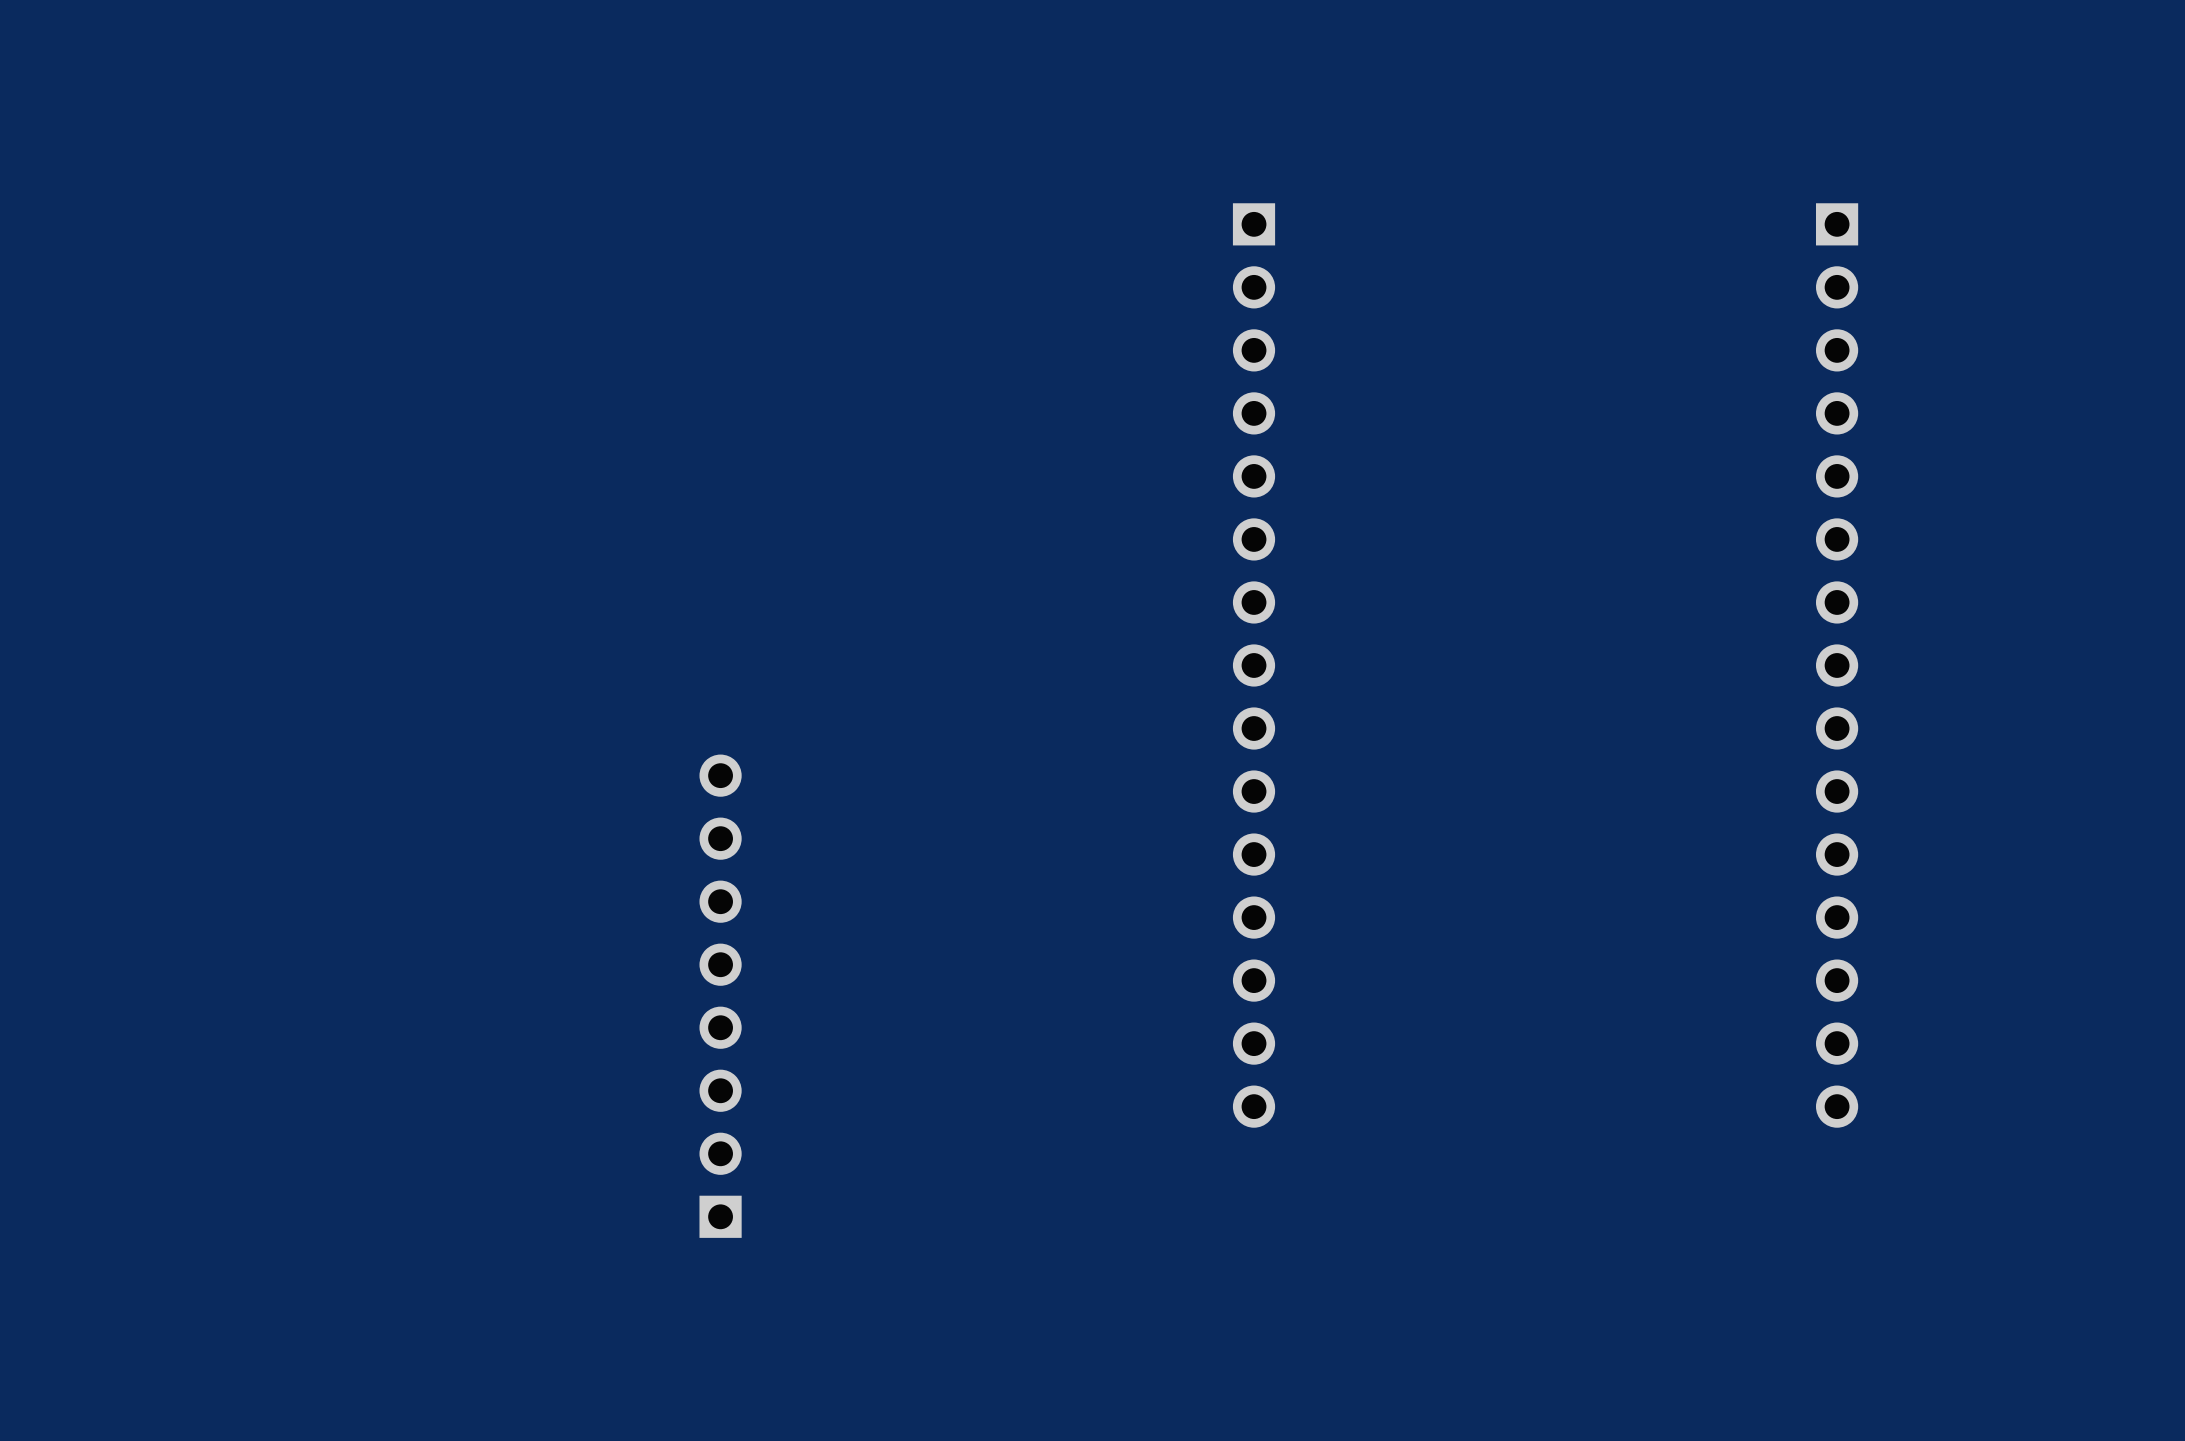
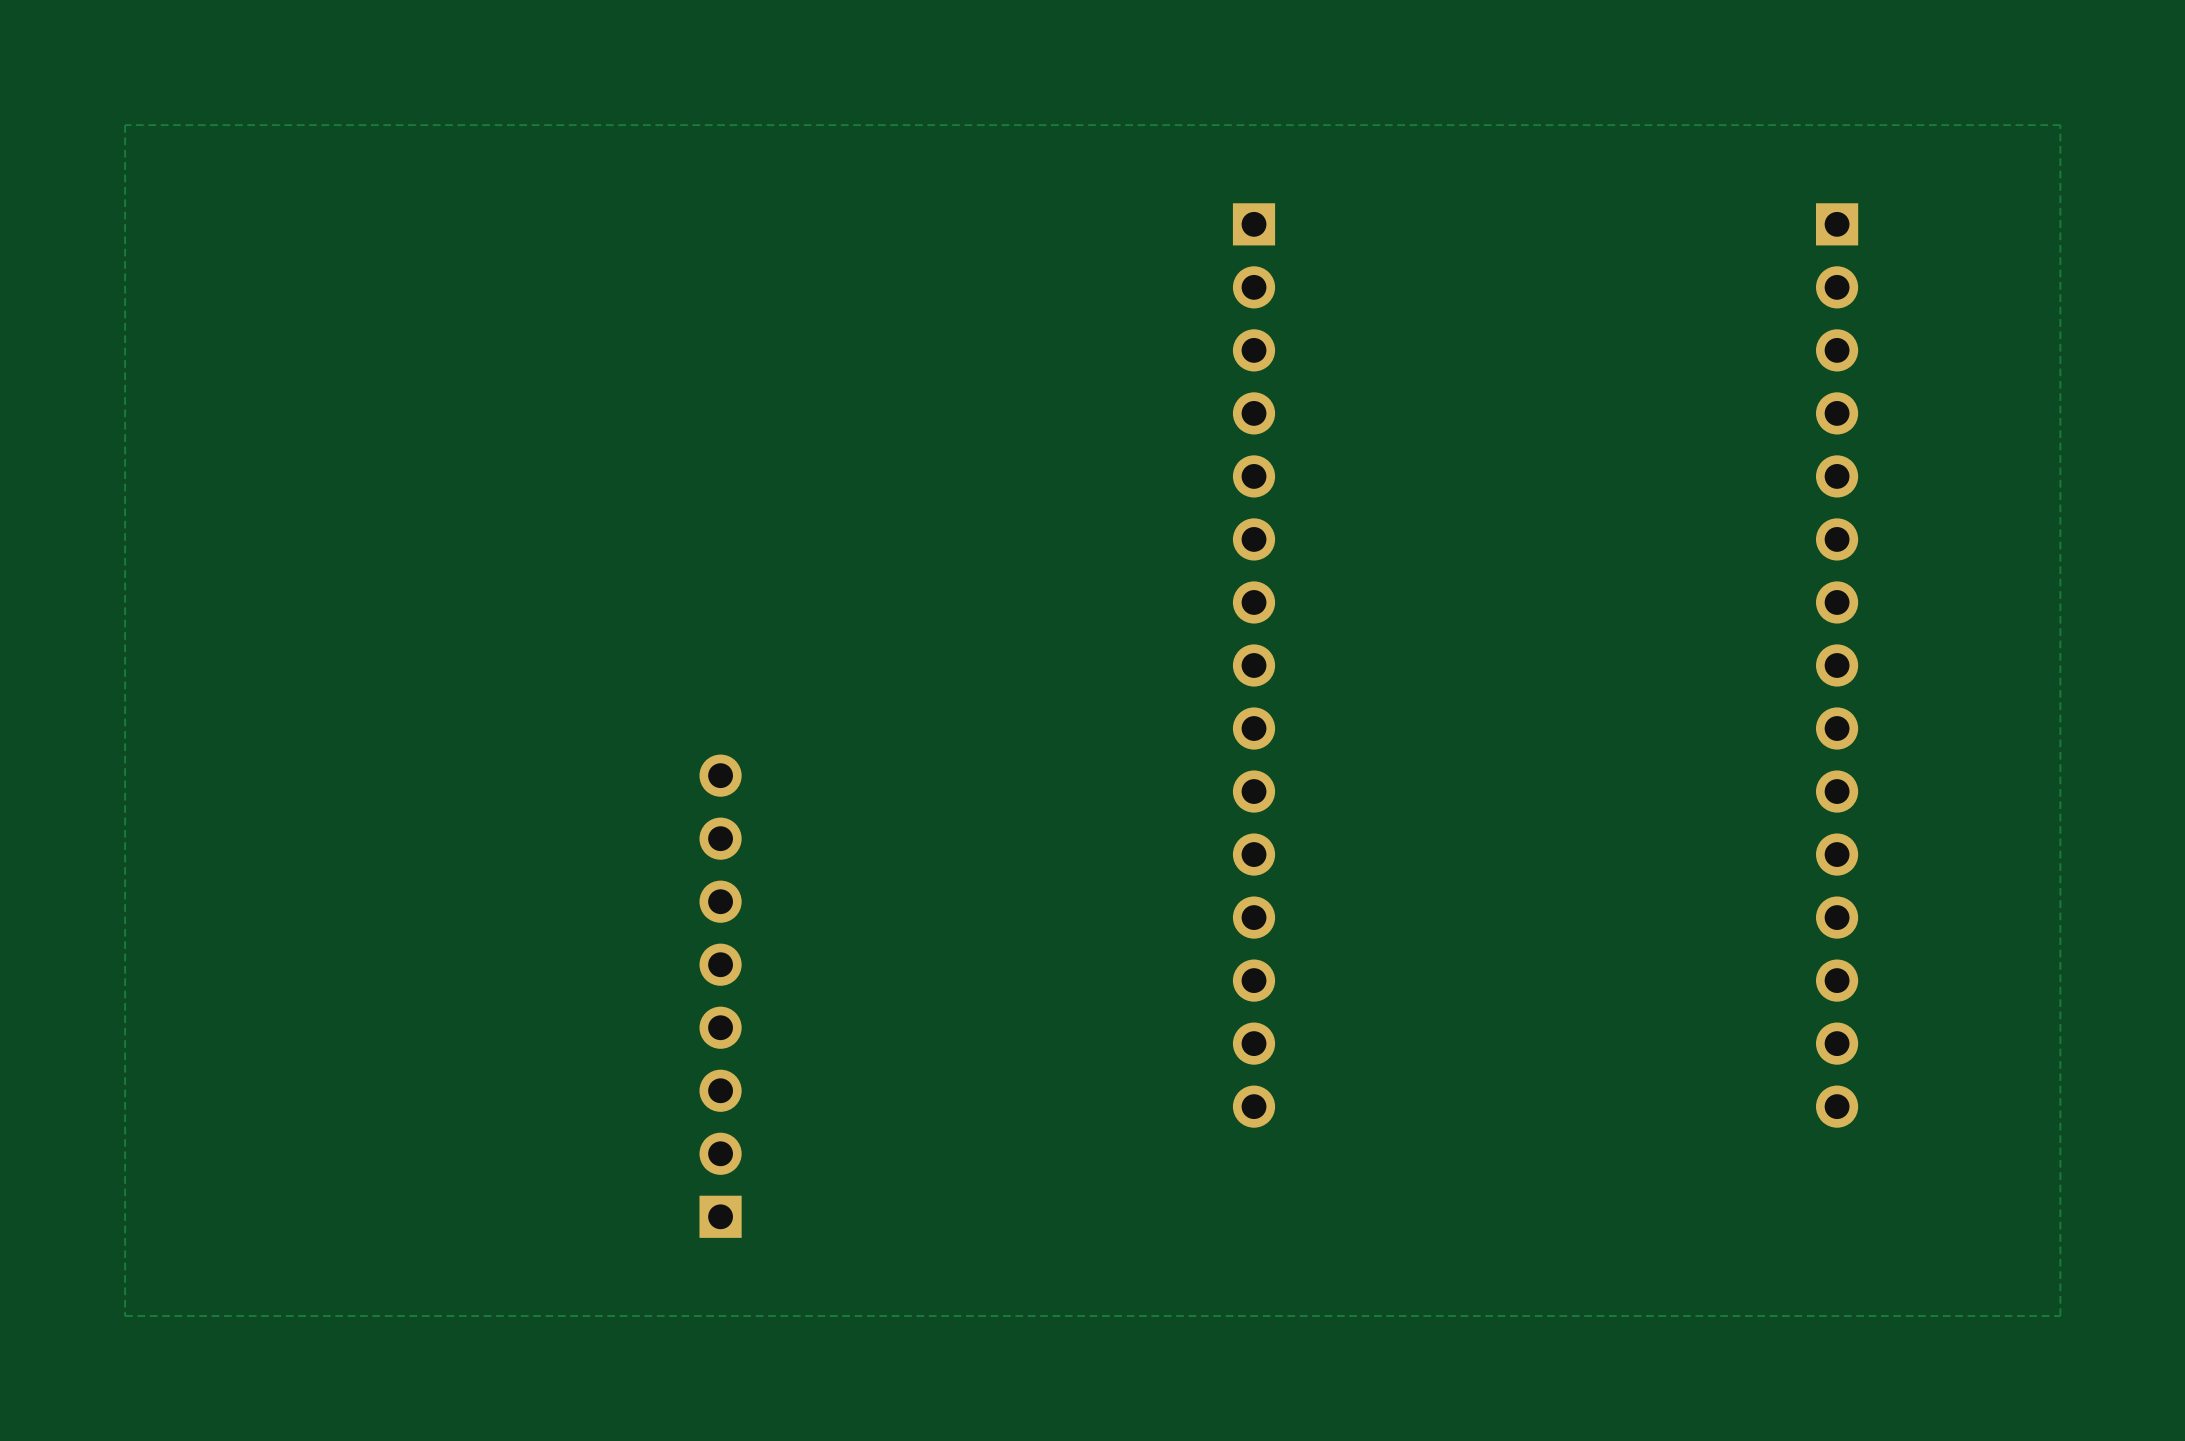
zone outline: none -> (2060, 125) (125, 125) (125, 1316) (2060, 1316) (2060, 125)

